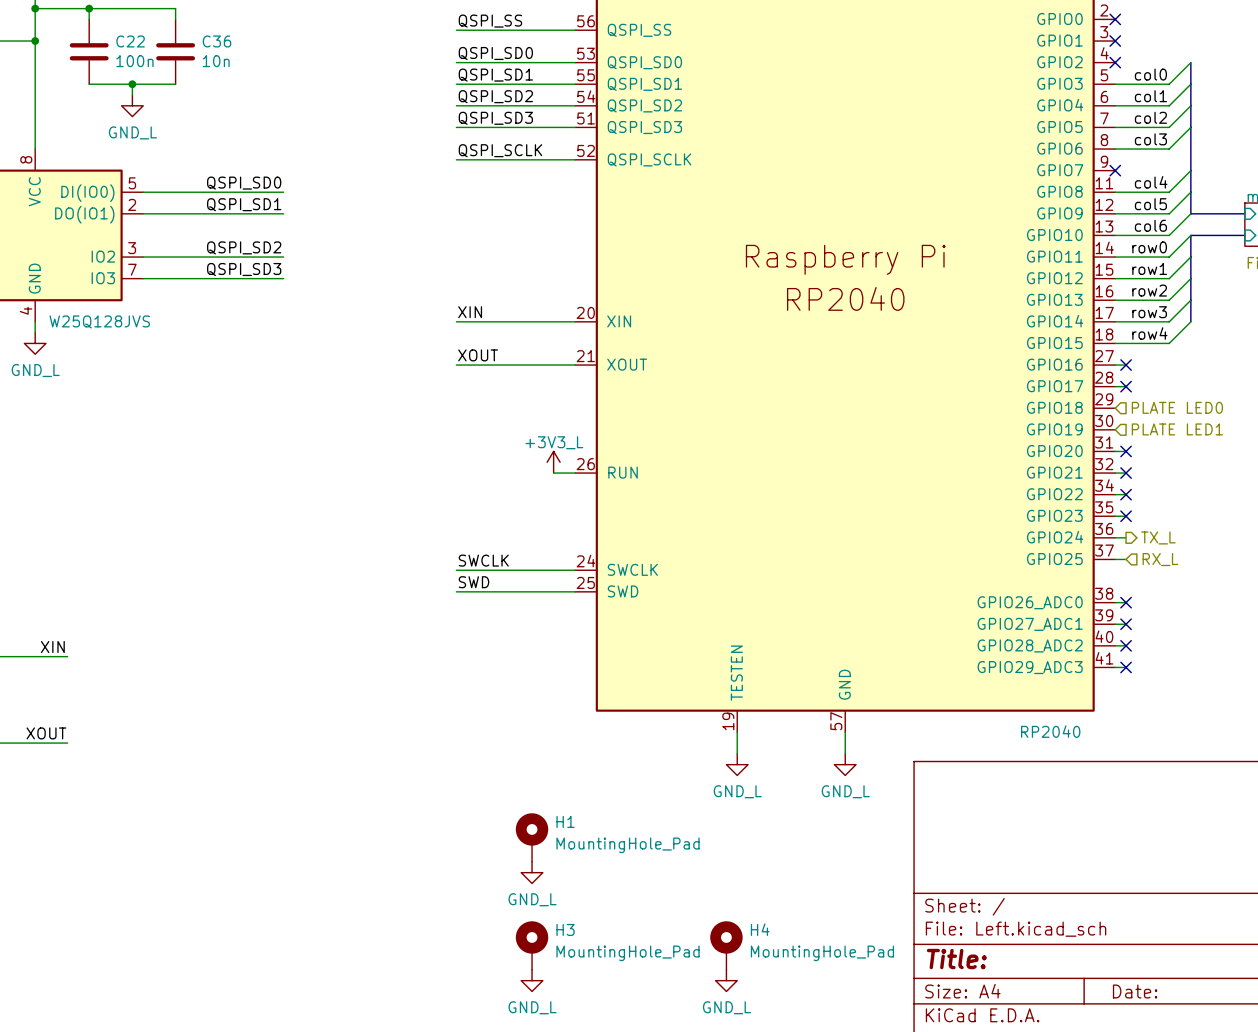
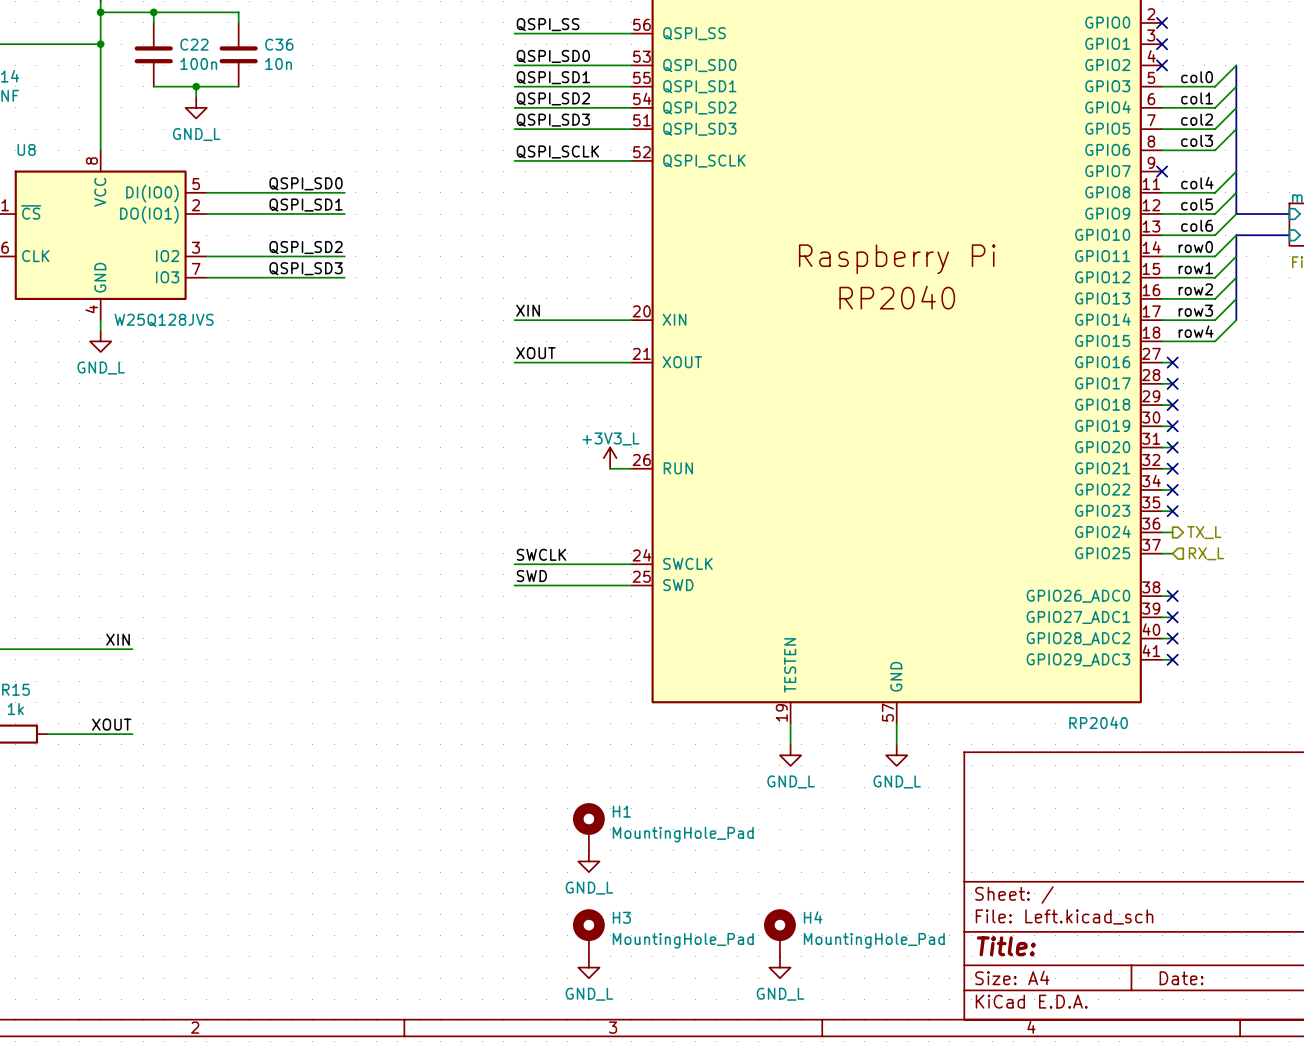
hierarchical label: PLATE LED0 (1177, 407) -> none
wire: none -> (1162, 405) (1172, 405)
no-connect mark: none -> (1172, 405)
wire: none -> (1162, 426) (1172, 426)
no-connect mark: none -> (1172, 426)
hierarchical label: PLATE LED1 (1177, 429) -> none

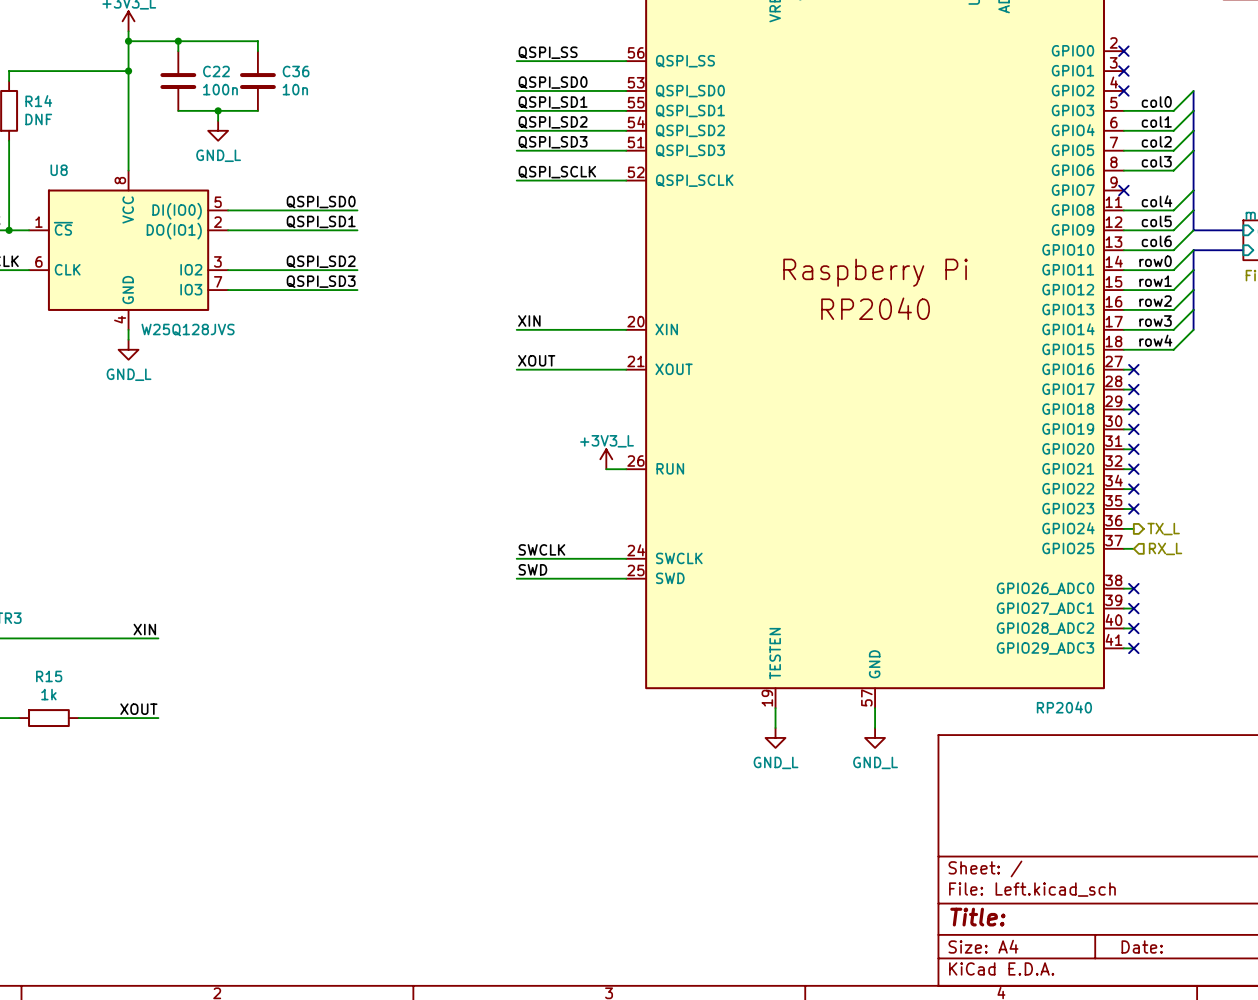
H1: MountingHole_Pad (588, 826) -> none
power symbol: GND_L (588, 861) -> none
H3: MountingHole_Pad (588, 933) -> none
H4: MountingHole_Pad (779, 933) -> none
power symbol: GND_L (588, 967) -> none
power symbol: GND_L (779, 967) -> none

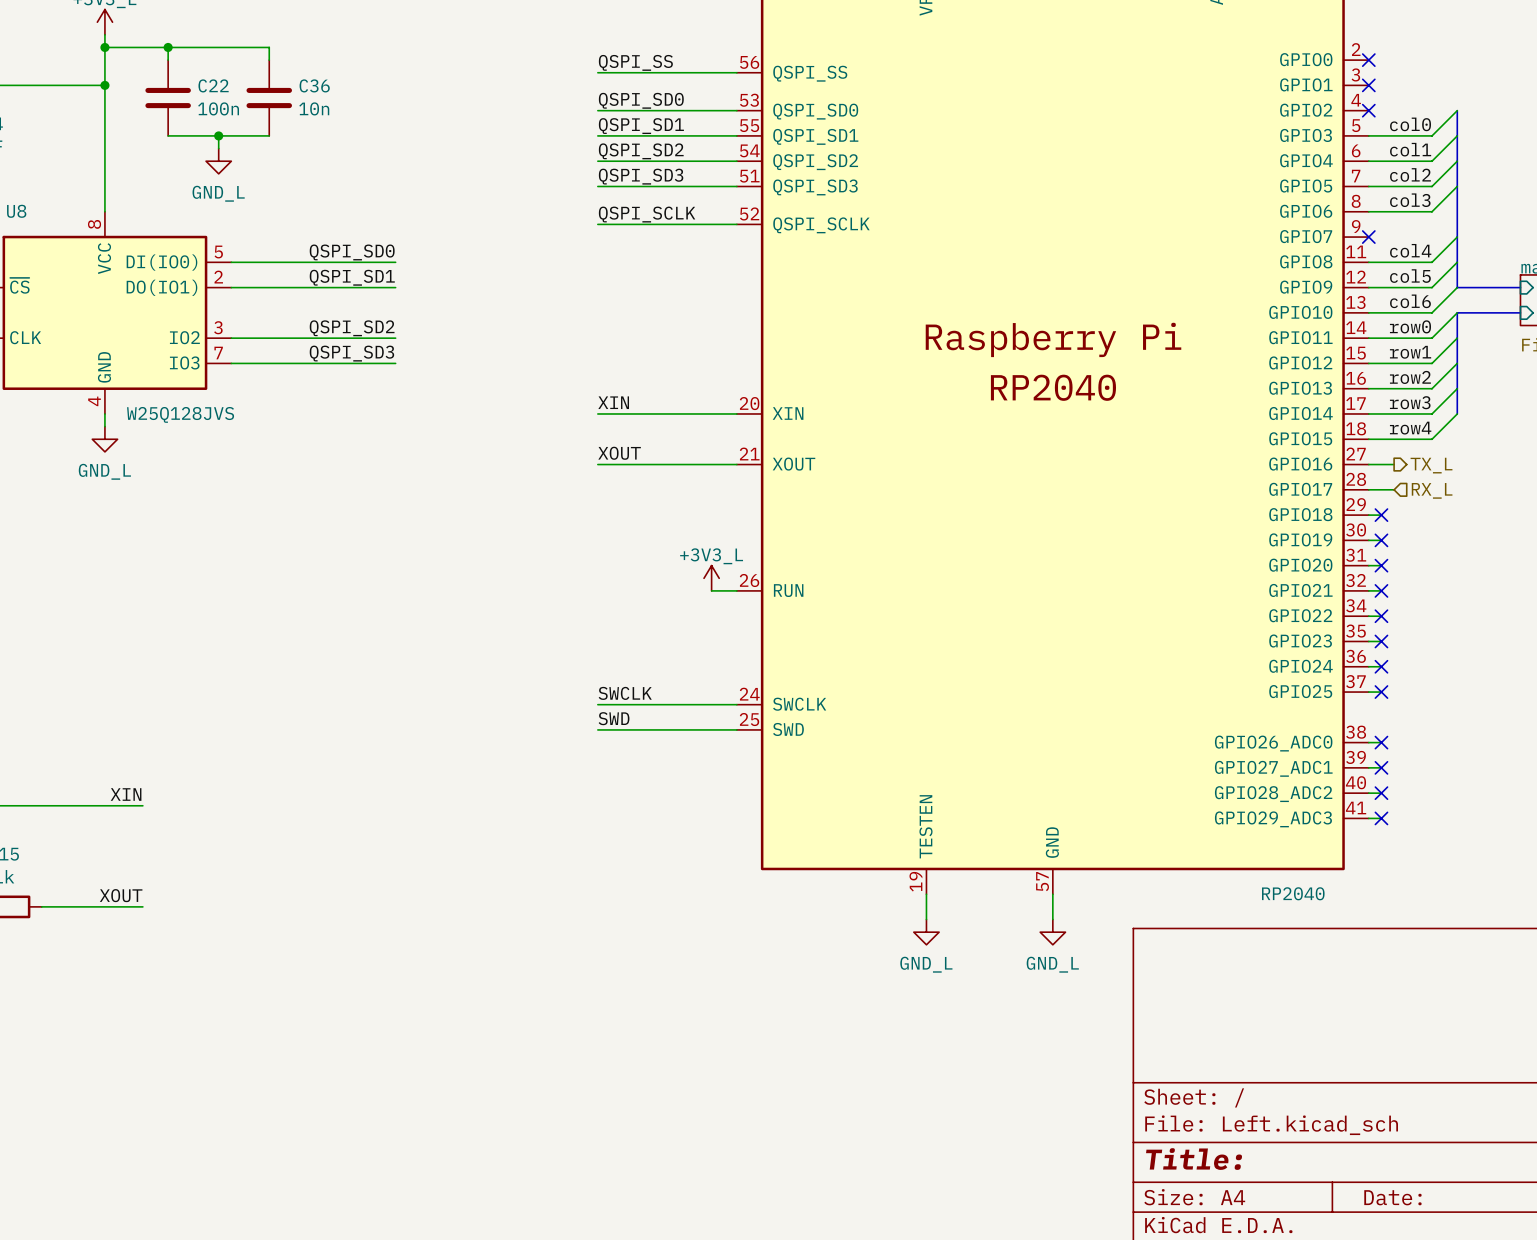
wire: none -> (1381, 464) (1394, 464)
no-connect mark: (1133, 369) -> none
wire: none -> (1381, 489) (1394, 489)
no-connect mark: (1133, 389) -> none
no-connect mark: none -> (1381, 666)
hierarchical label position: TX_L (1163, 529) -> TX_L (1431, 465)
no-connect mark: none -> (1381, 692)
hierarchical label position: RX_L (1165, 548) -> RX_L (1432, 490)

